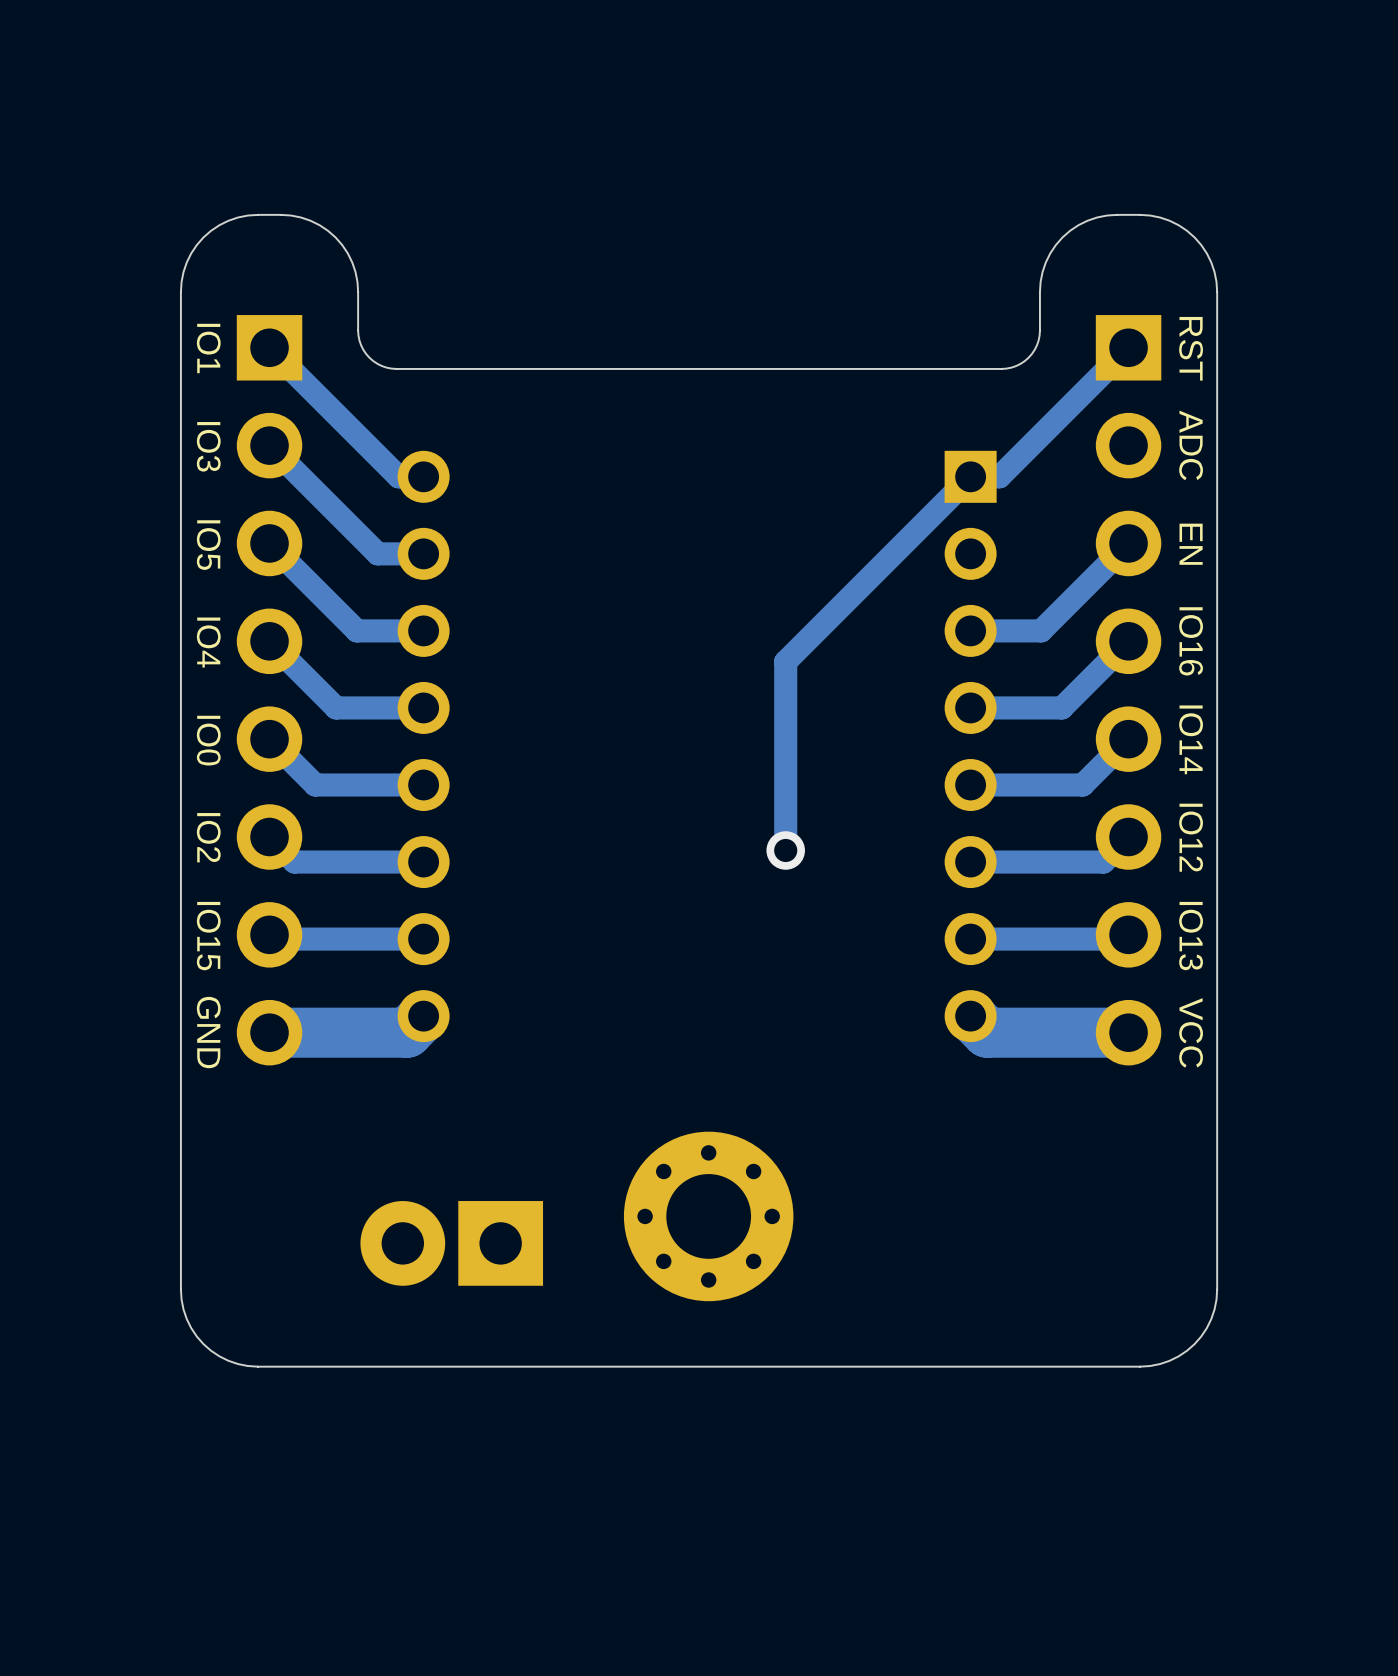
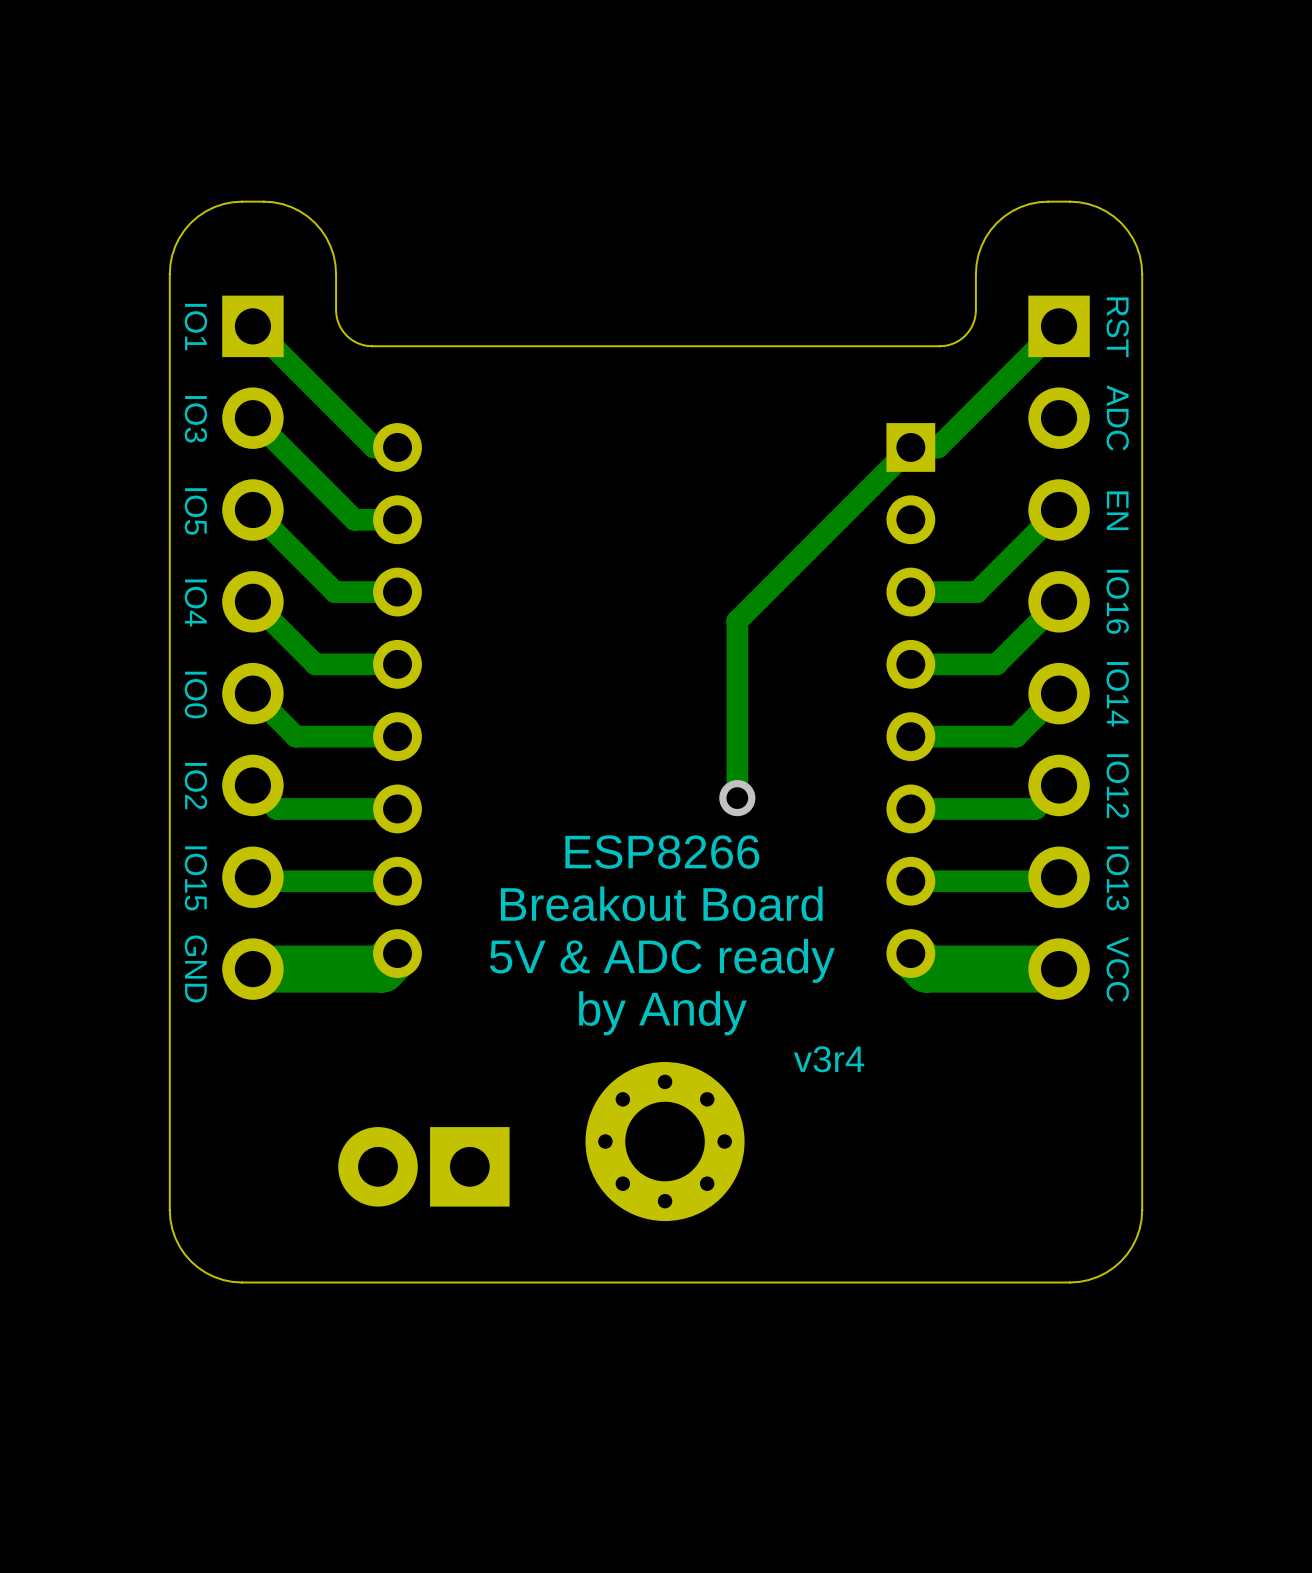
text: none -> ESP8266 (662, 852)
text: none -> Breakout Board (661, 903)
text: none -> 5V & ADC ready (662, 960)
text: none -> by Andy (662, 1013)
text: none -> v3r4 (829, 1059)

